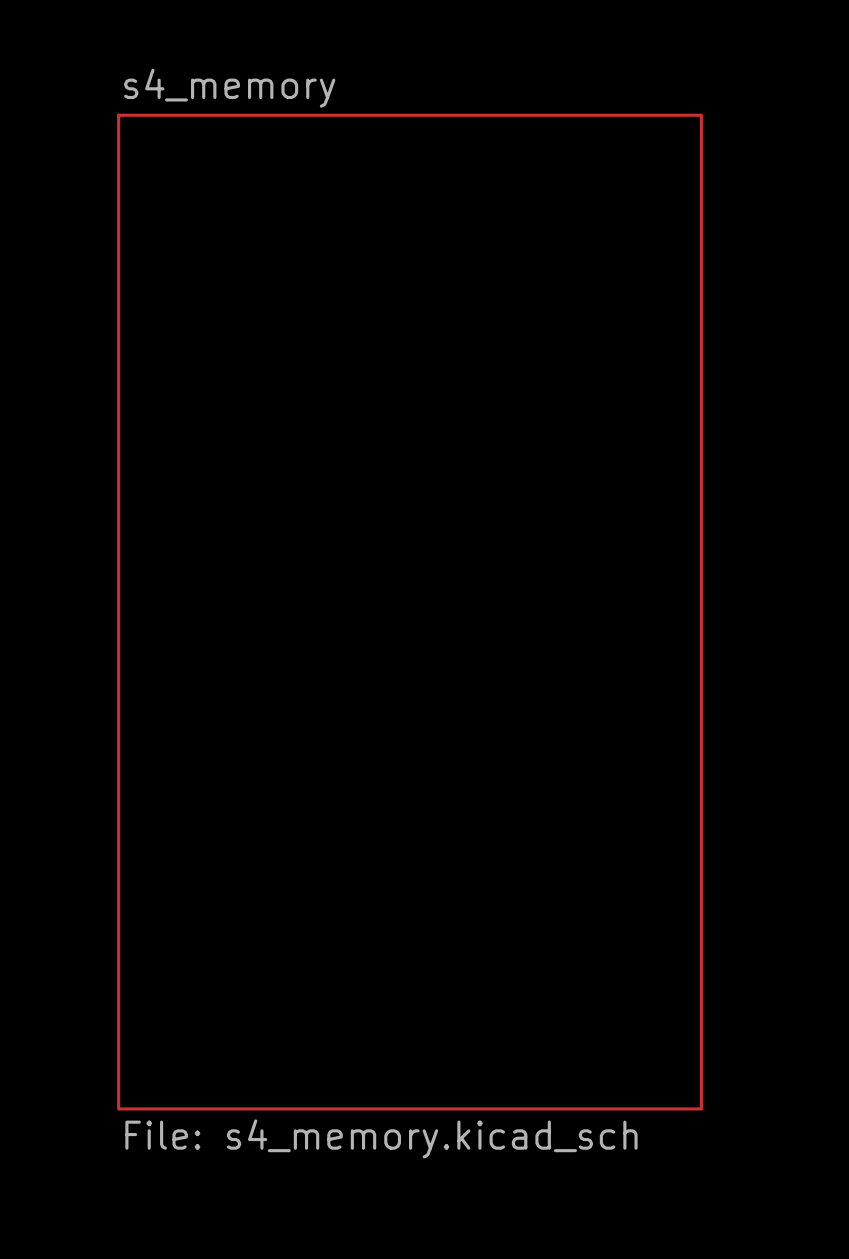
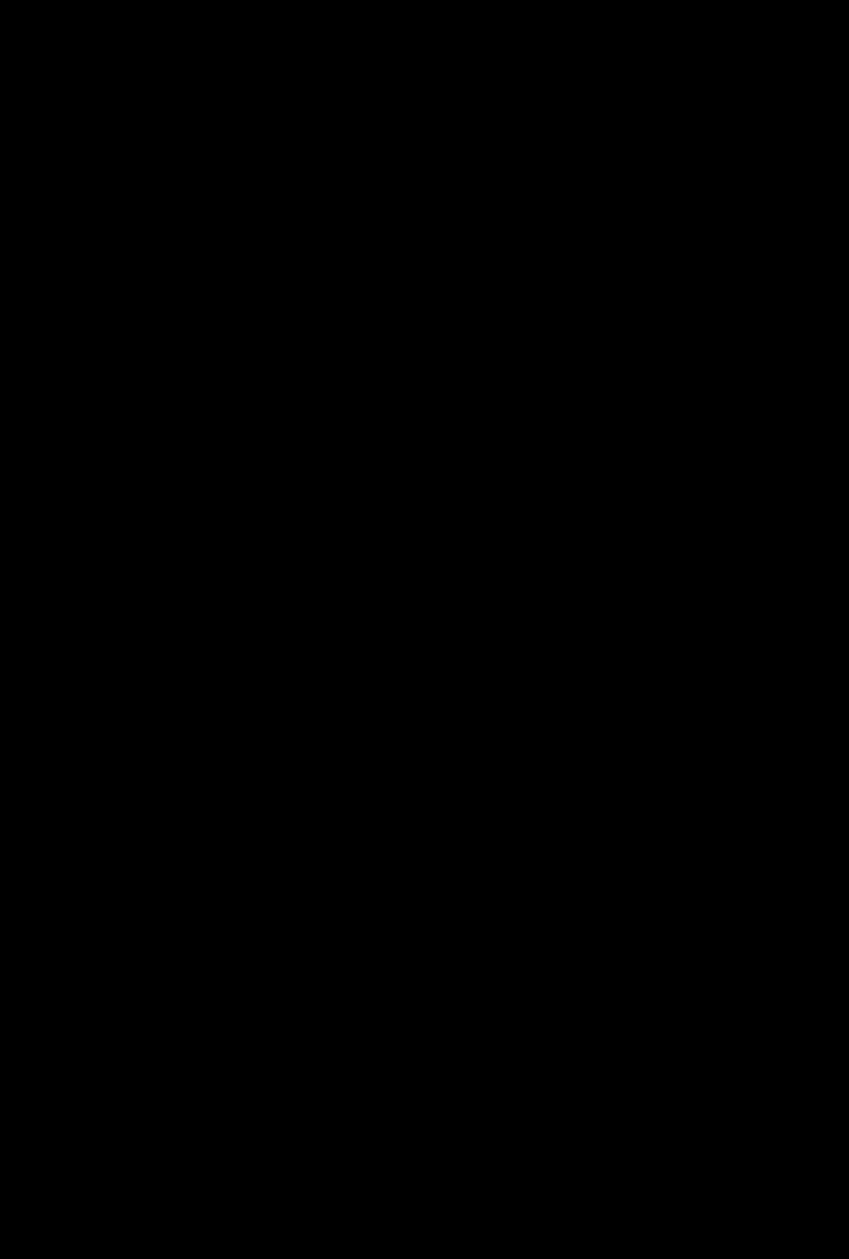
sheet s4_memory: File: s4_memory.kicad_sch (410, 612) -> none

